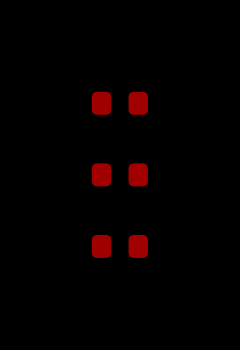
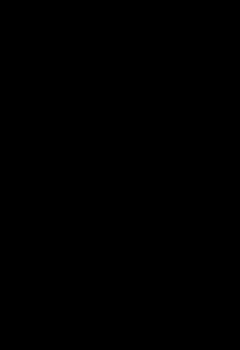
part: (119, 103) -> none
part: (119, 174) -> none
part: (119, 246) -> none

